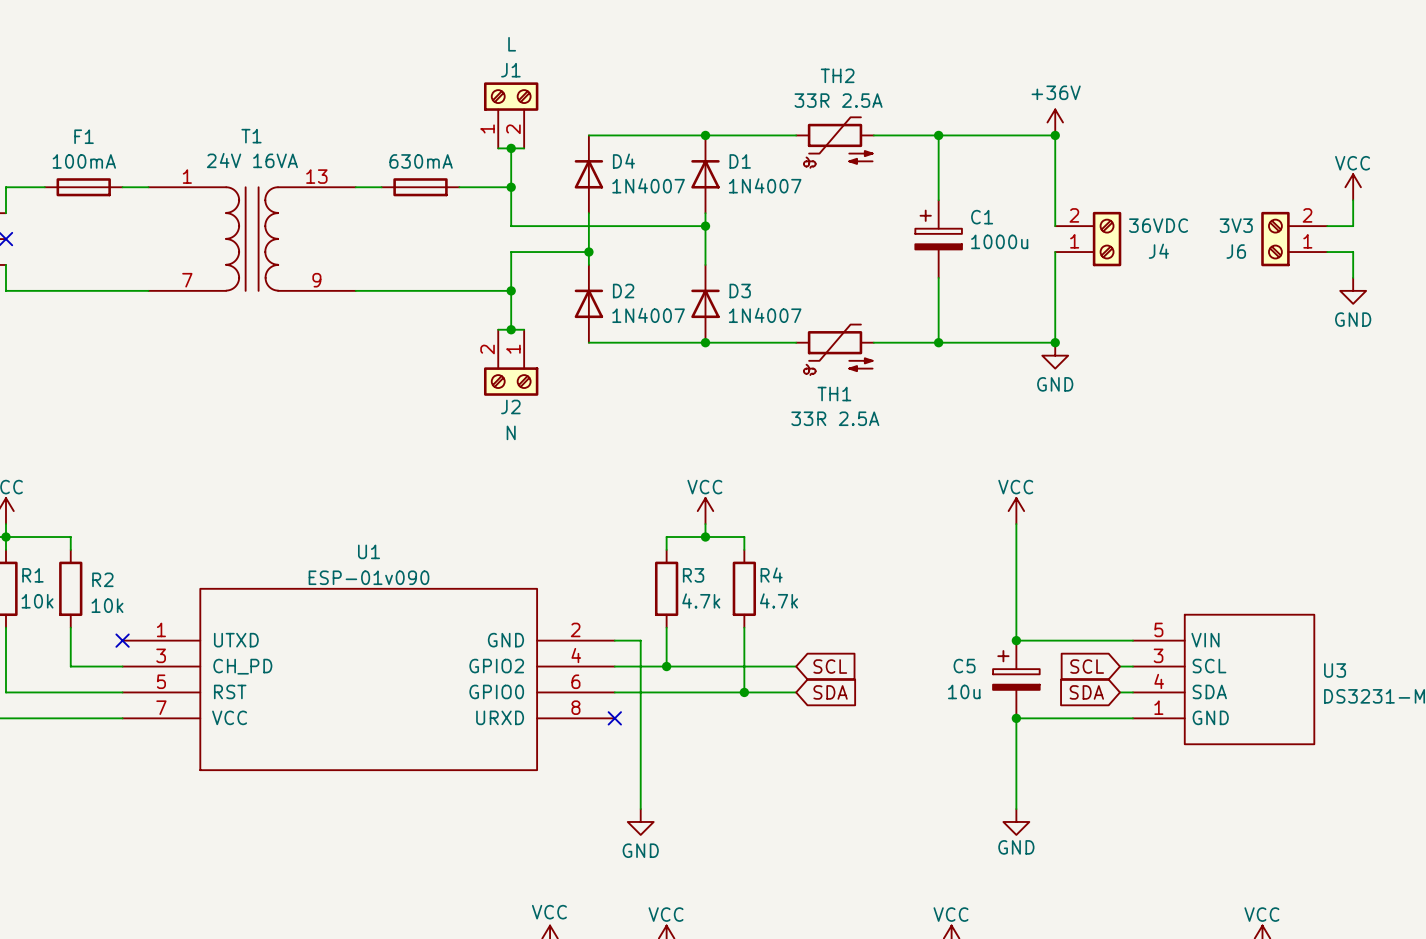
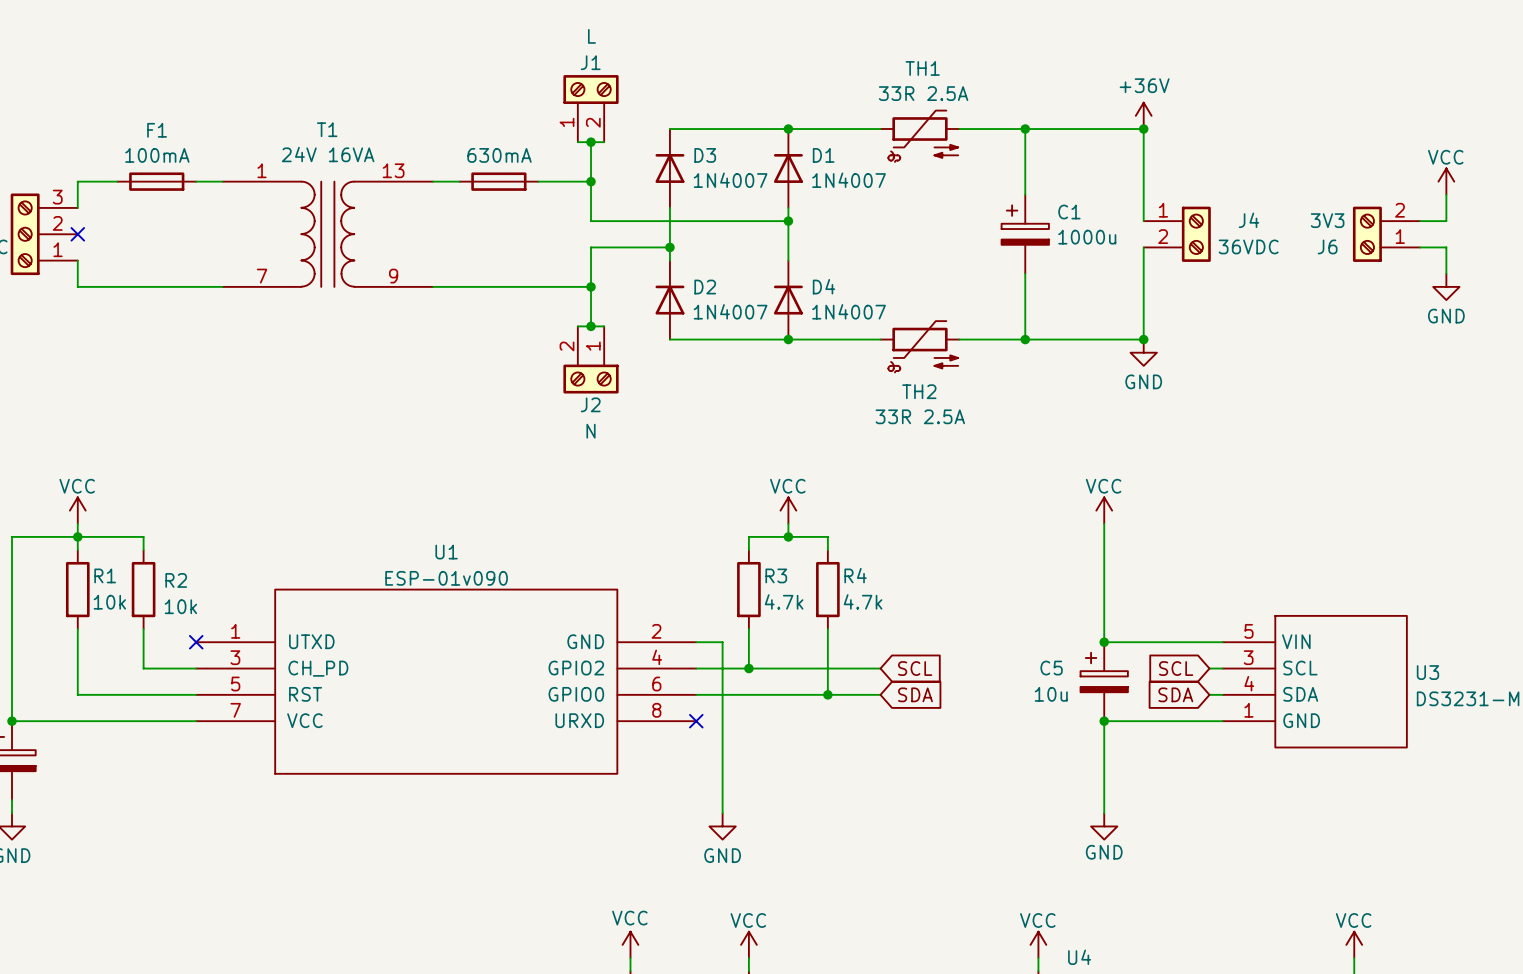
TH2 name: TH2 (837, 75) -> TH1 (922, 68)
D4 name: D4 (623, 161) -> D3 (705, 155)
J4 flip: as is (1107, 239) -> up-down (1196, 234)
D3 name: D3 (740, 290) -> D4 (823, 286)
TH1 name: TH1 (834, 394) -> TH2 (919, 391)

